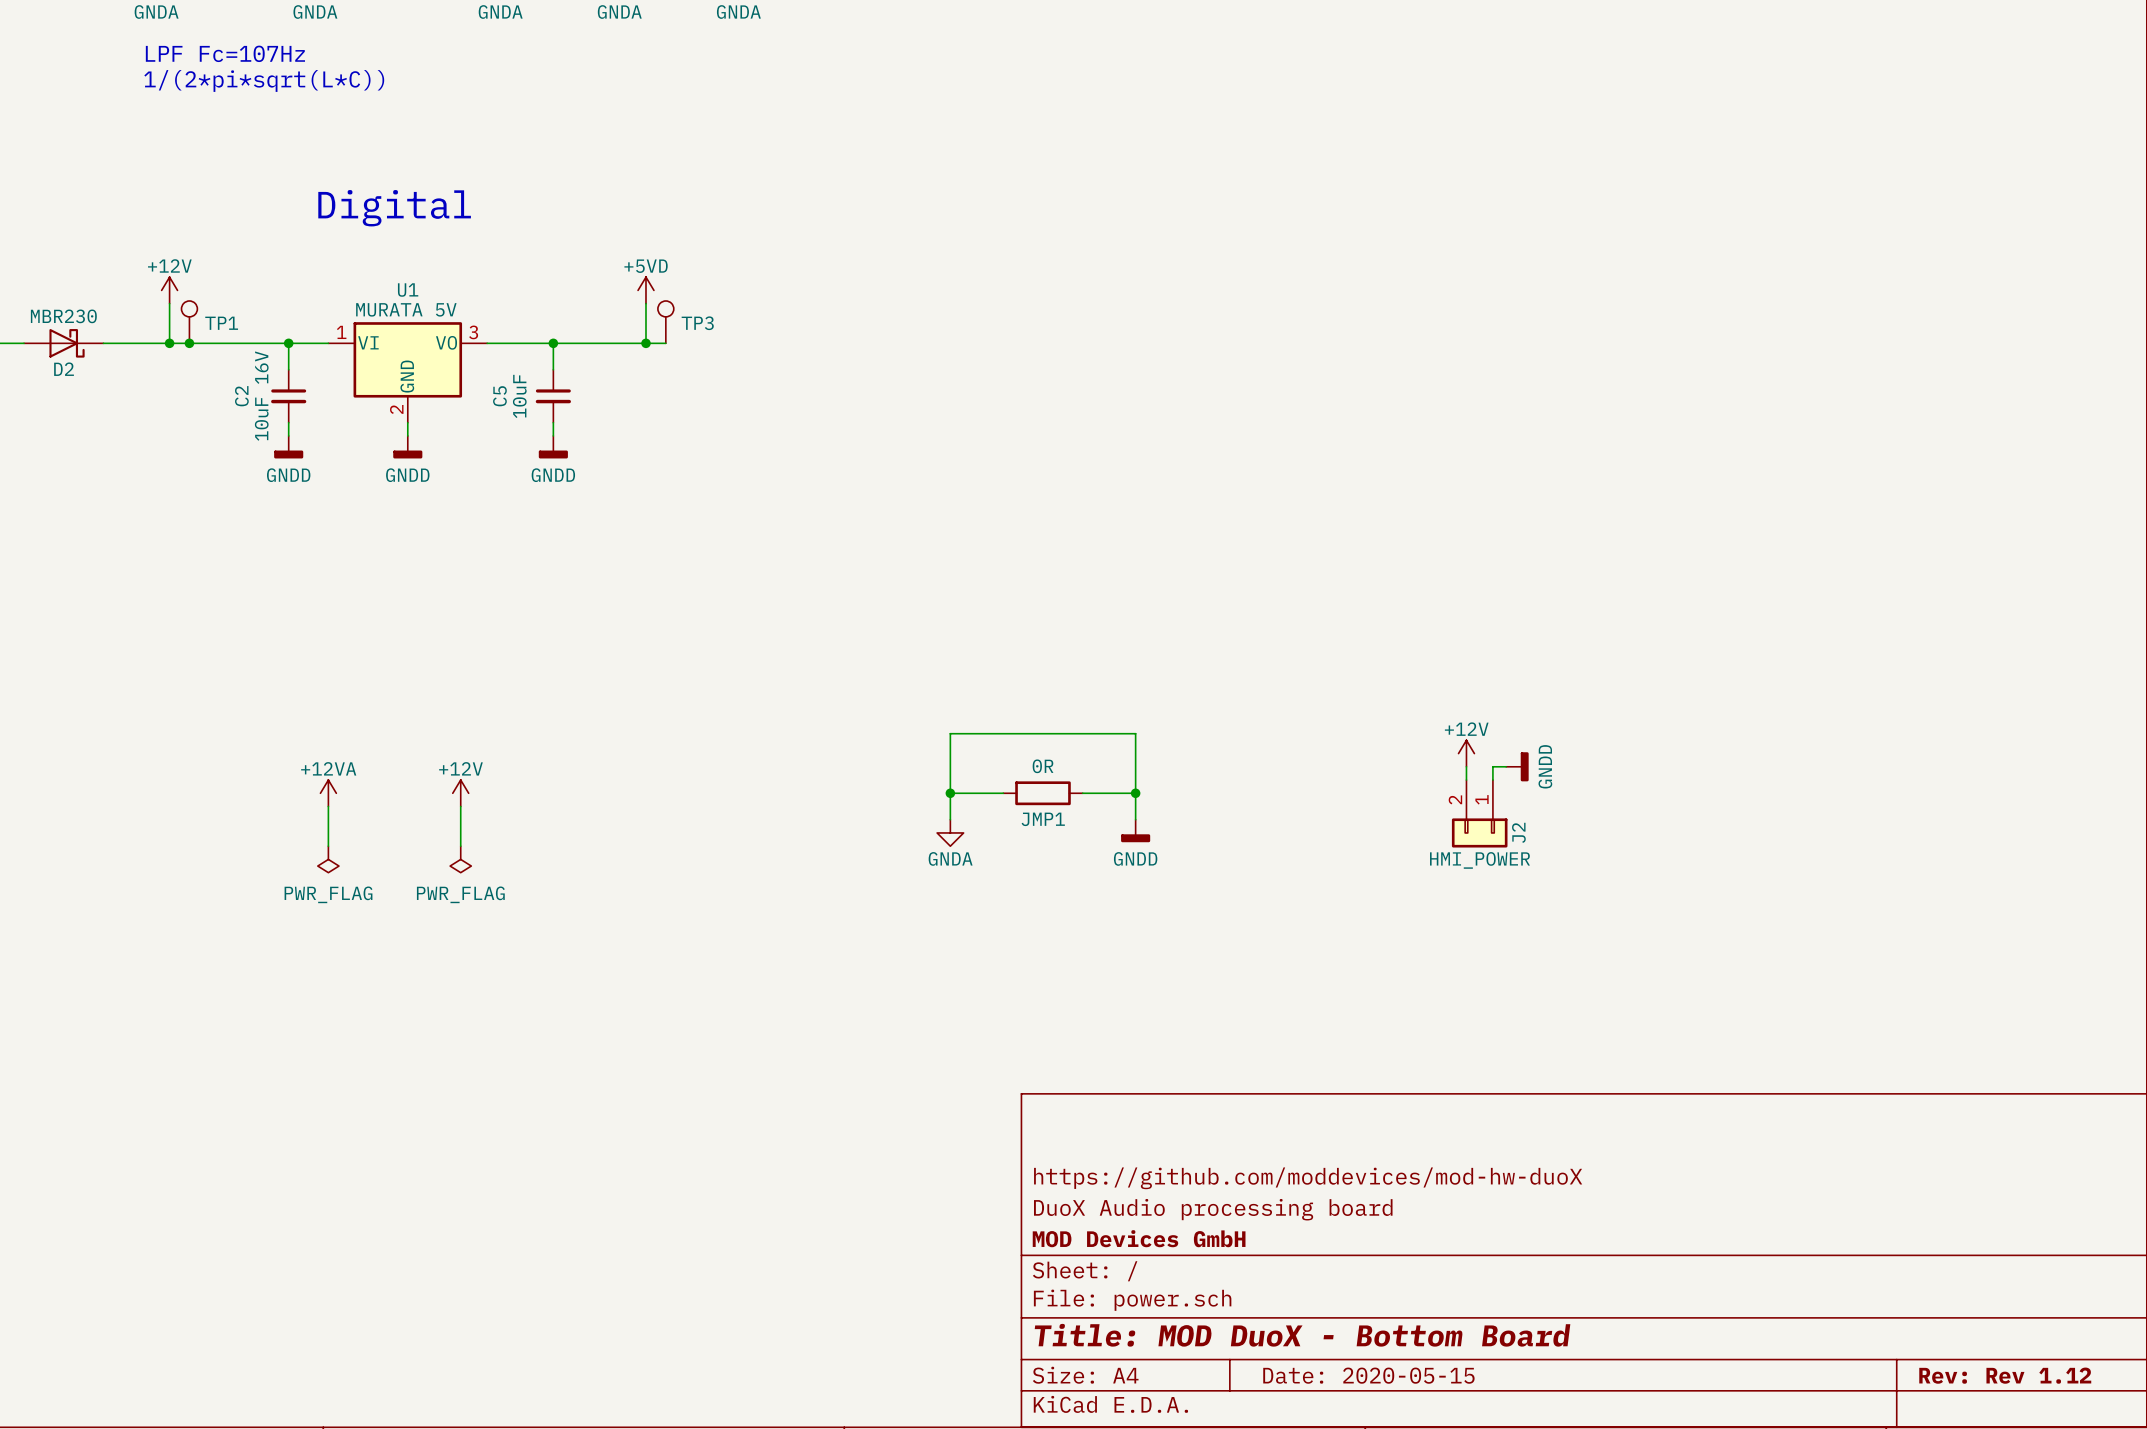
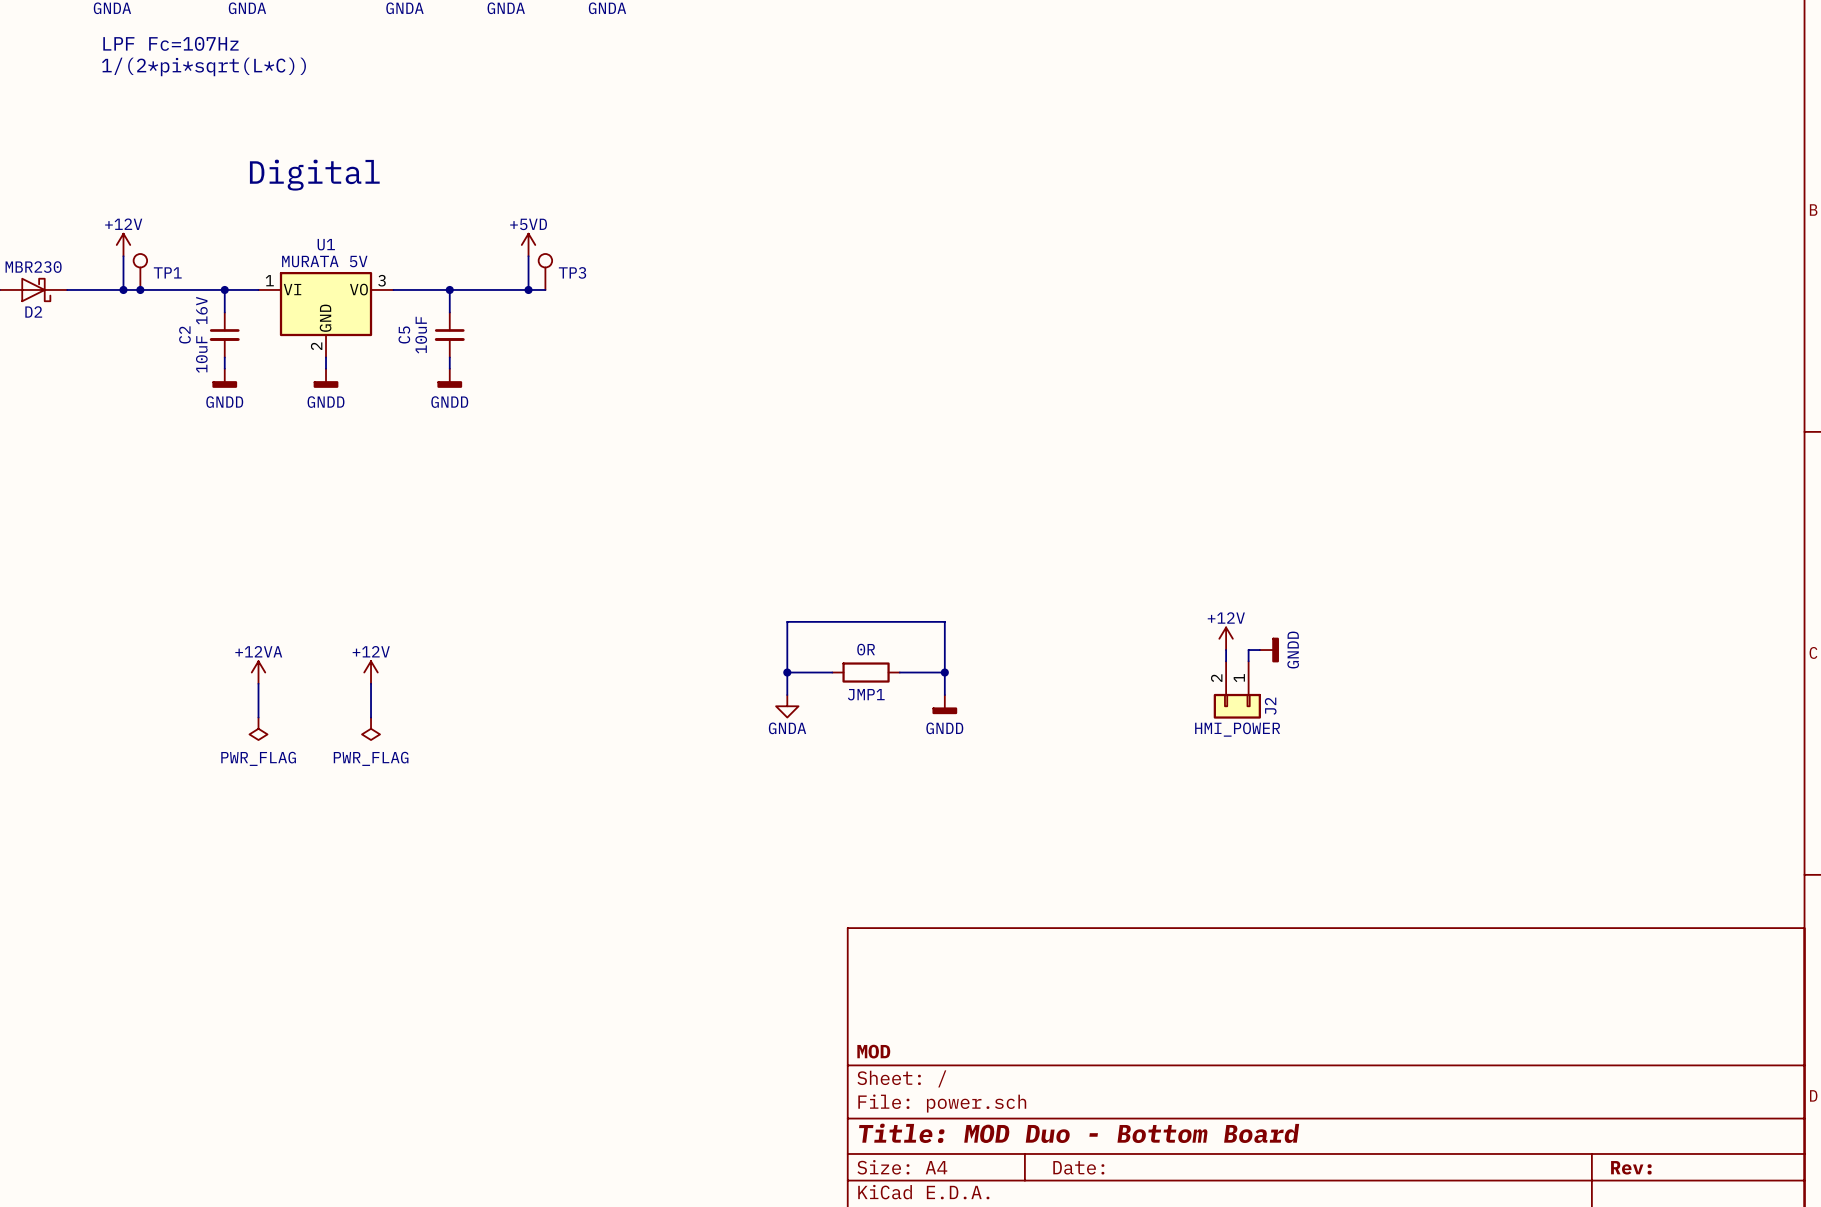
title block: https://github.com/moddevices/mod-hw-duoX (1308, 1178) -> none
title block: DuoX Audio processing board (1213, 1209) -> none
title block: MOD Devices GmbH (1139, 1238) -> MOD (873, 1051)
title block: Title: MOD DuoX - Bottom Board (1302, 1335) -> Title: MOD Duo - Bottom Board (1079, 1133)
title block: Date: 2020-05-15 (1368, 1375) -> Date: (1078, 1167)
title block: Rev: Rev 1.12 (2005, 1375) -> Rev: (1631, 1167)

